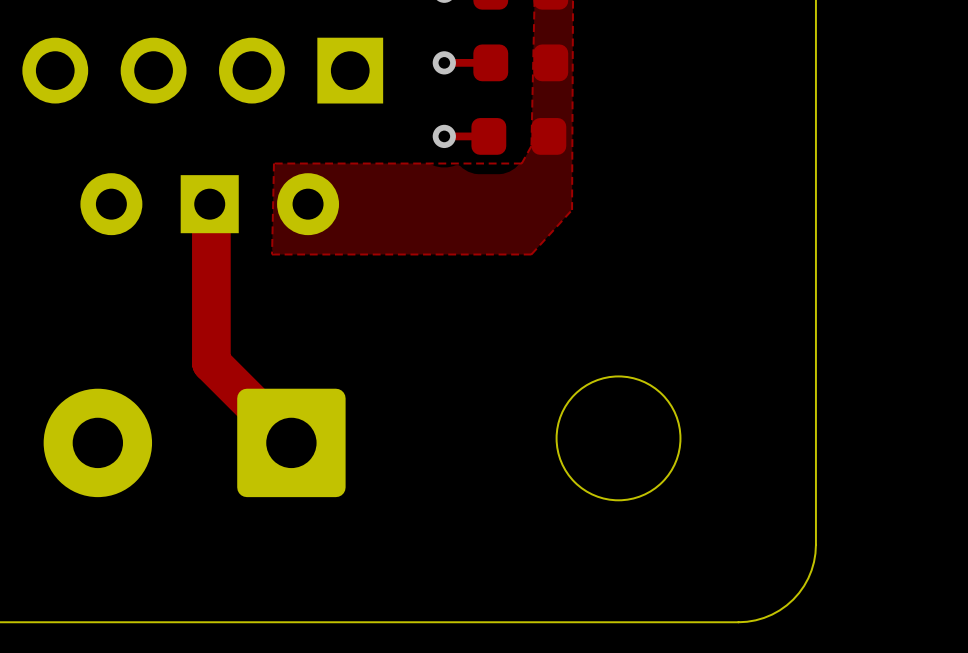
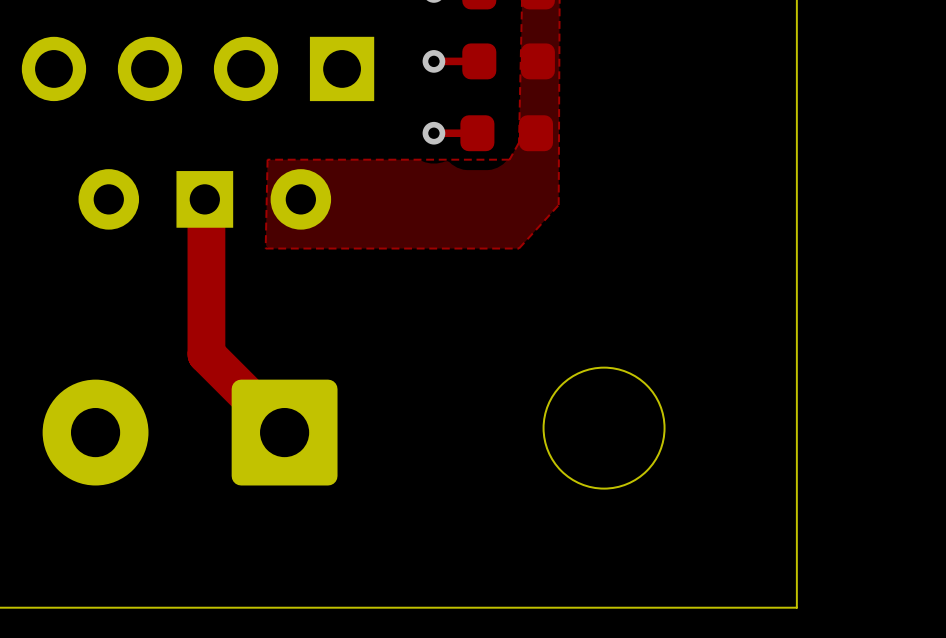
board edge: (815, 544) (811, 570) (804, 586) (793, 599) (779, 610) (764, 617) (738, 622) -> (796, 532) (796, 607) (721, 607)

